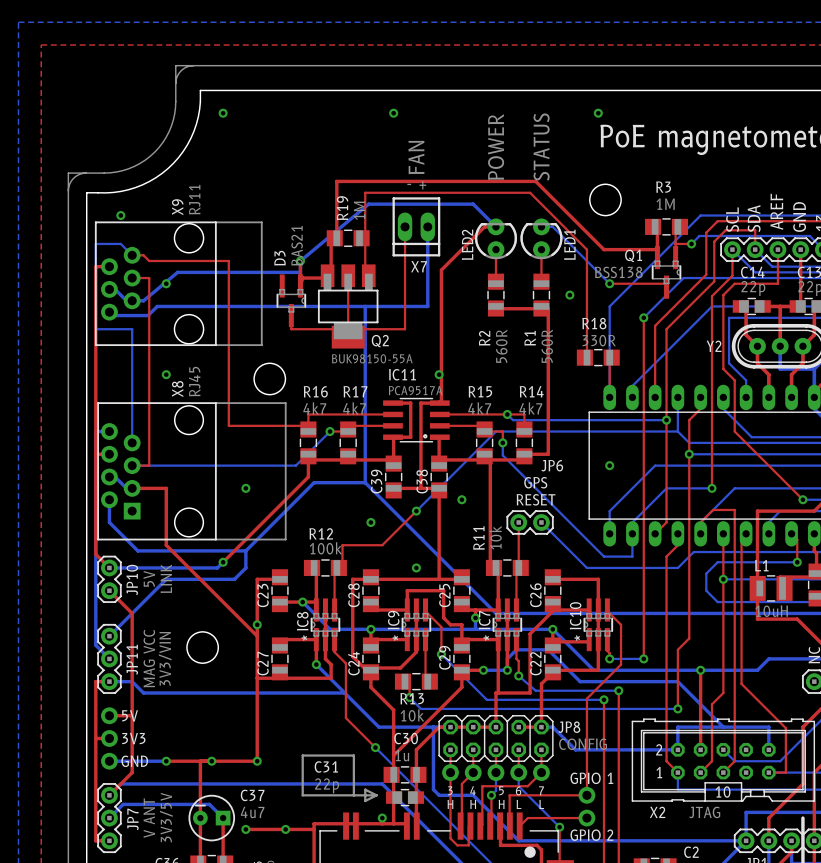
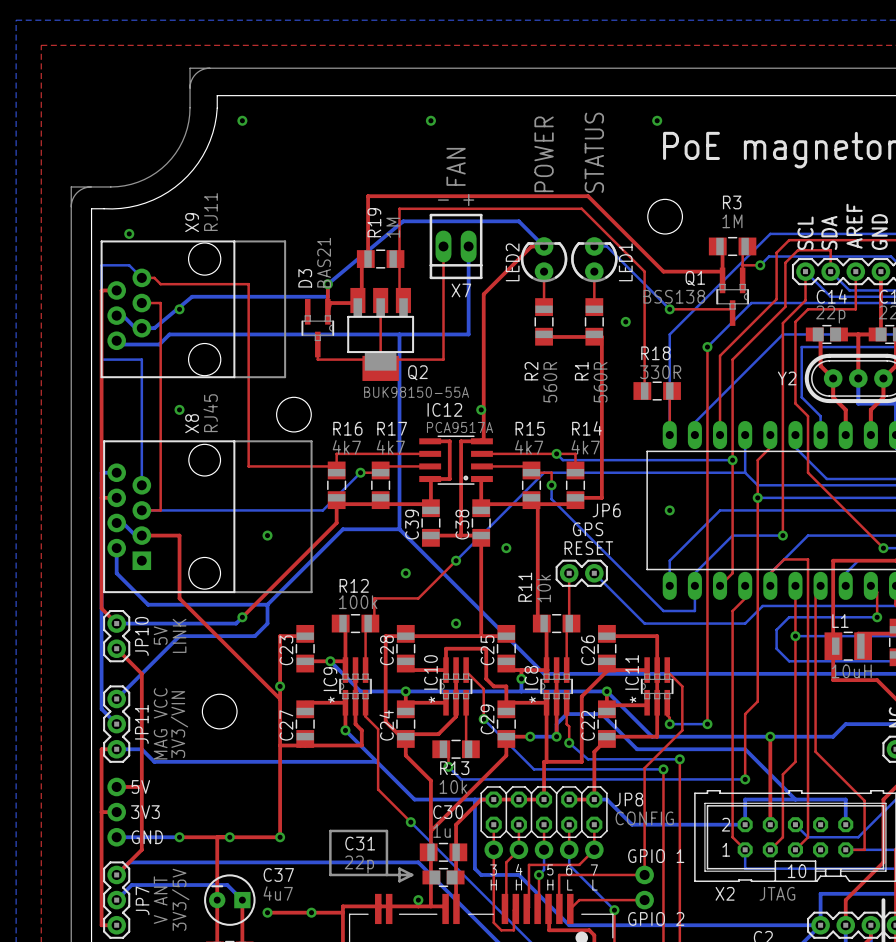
IC11 name: IC11 (402, 374) -> IC12 (444, 409)
IC10 name: IC10 (575, 615) -> IC11 (632, 672)
IC9 name: IC9 (393, 620) -> IC10 (430, 672)
IC7 name: IC7 (484, 620) -> IC8 (531, 677)
IC8 name: IC8 (302, 621) -> IC9 (330, 679)

